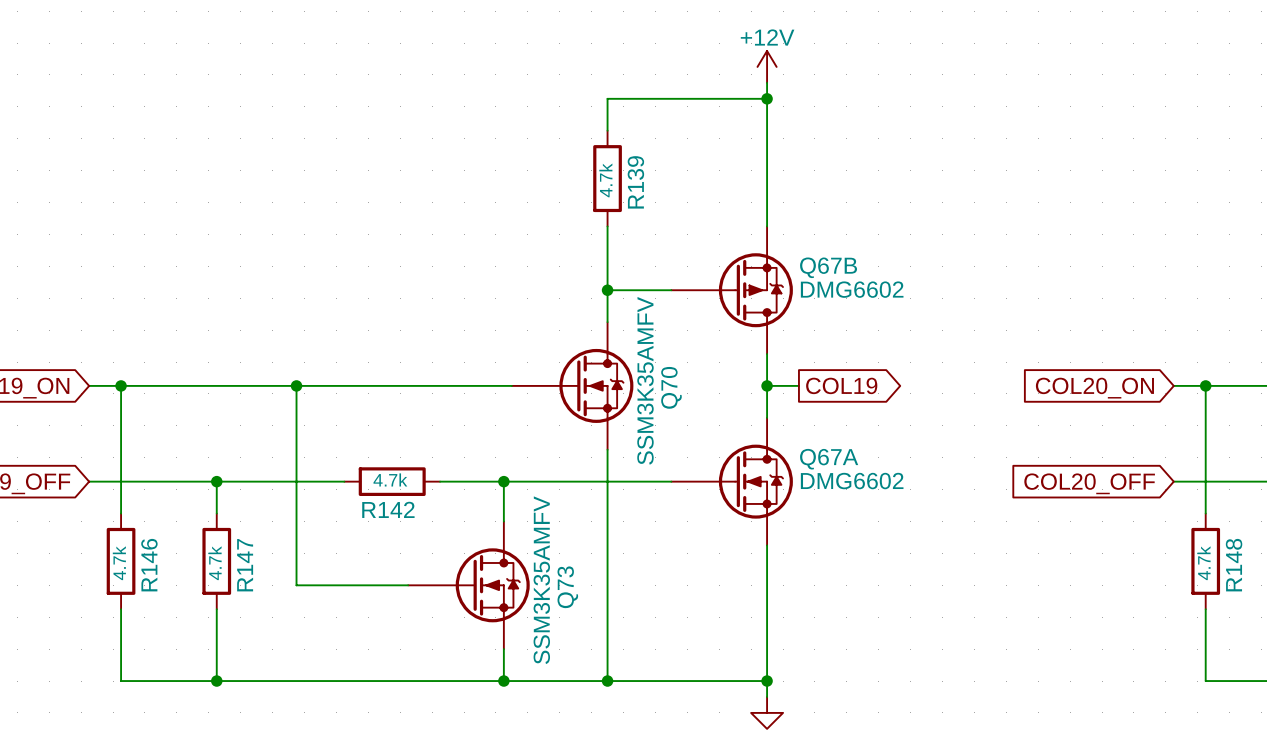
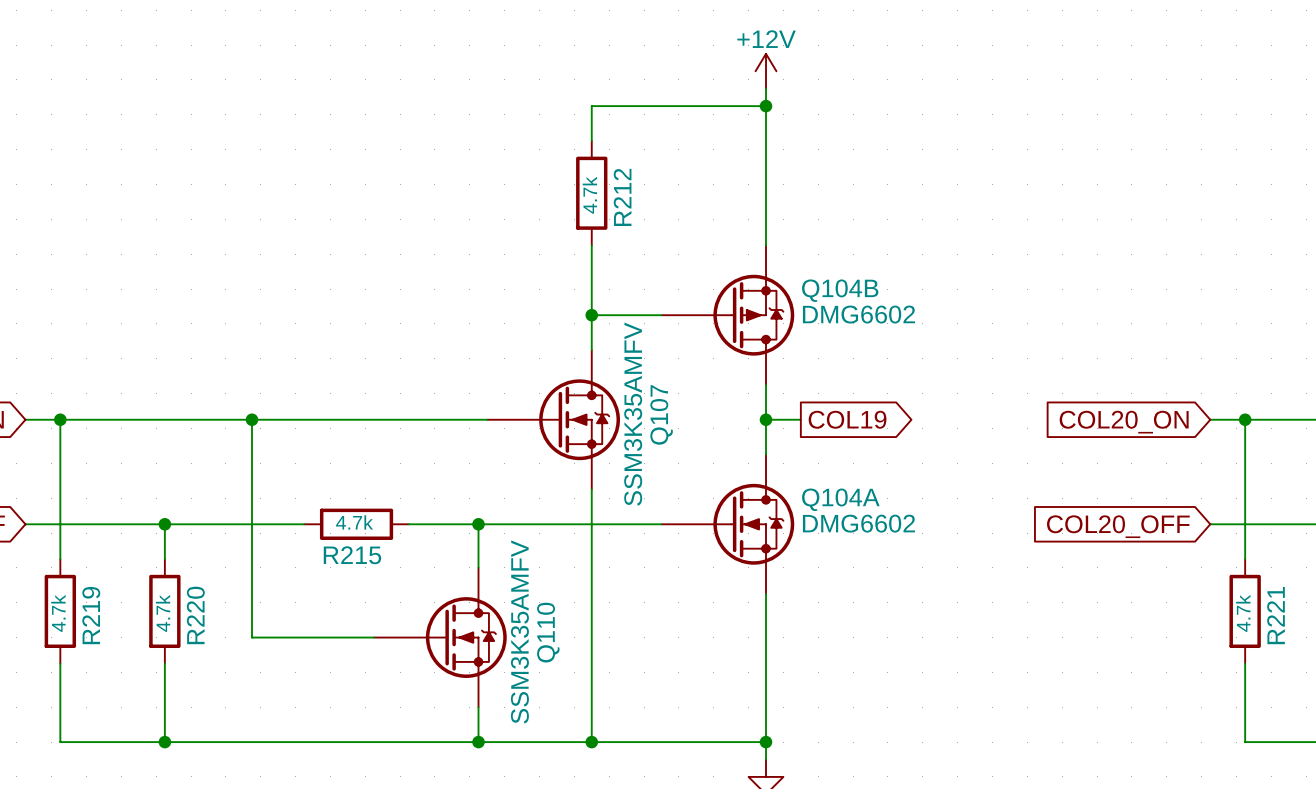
R139 name: R139 (635, 182) -> R212 (622, 197)
Q67B name: Q67B (828, 267) -> Q104B (840, 290)
Q70 name: Q70 (671, 387) -> Q107 (661, 414)
Q67A name: Q67A (829, 459) -> Q104A (840, 499)
R142 name: R142 (388, 509) -> R215 (352, 555)
R146 name: R146 (149, 565) -> R219 (91, 615)
R147 name: R147 (245, 565) -> R220 (195, 615)
R148 name: R148 (1234, 565) -> R221 (1276, 615)
Q73 name: Q73 (567, 587) -> Q110 (548, 632)

